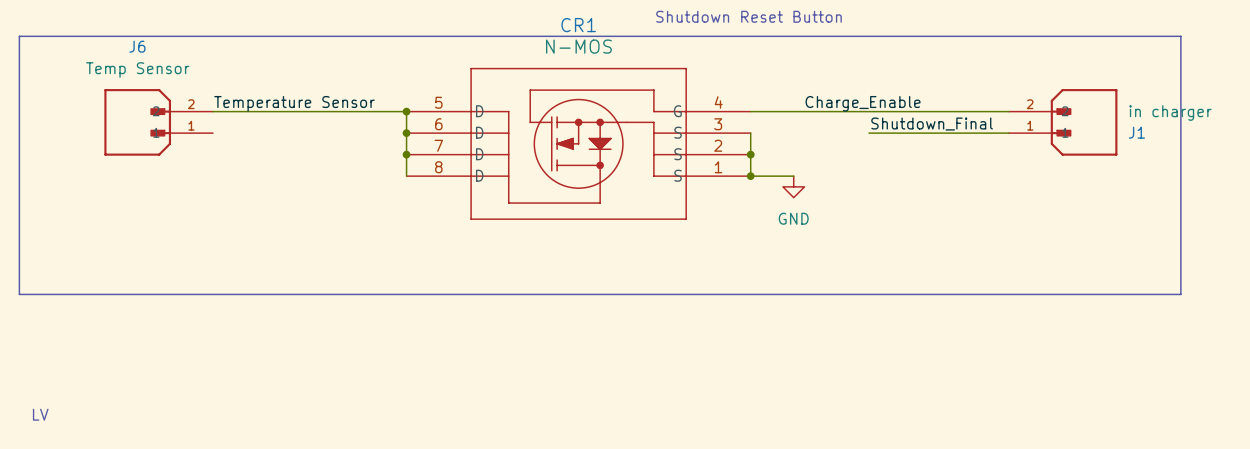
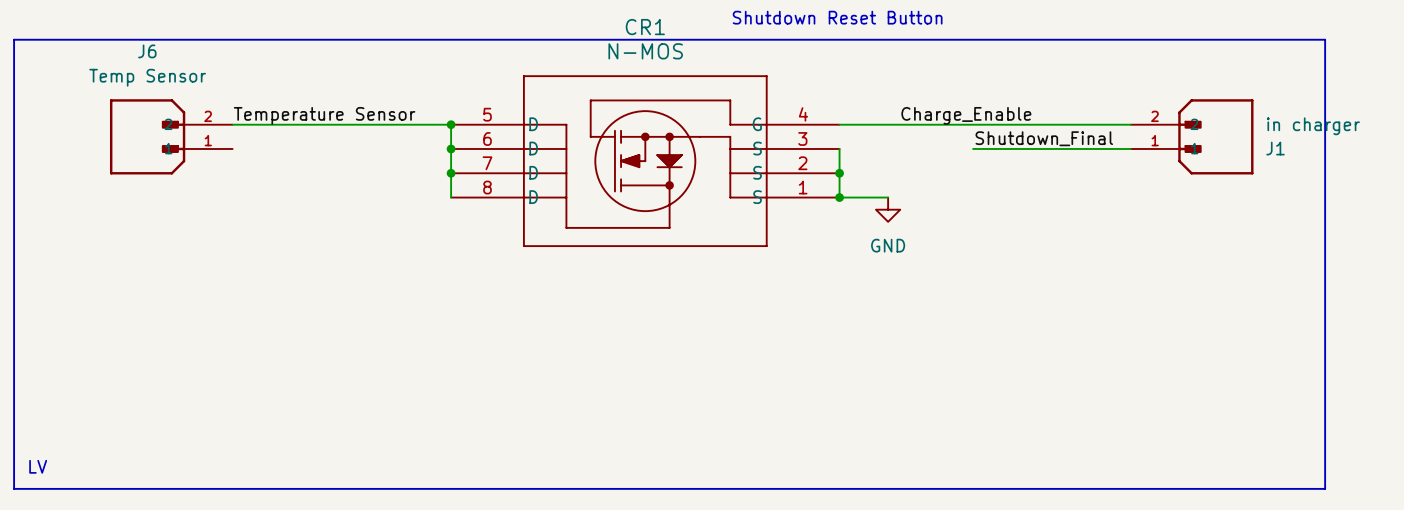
line: (19, 294) (1180, 294) -> (14, 331) (14, 488) (1325, 488) (1325, 331)

